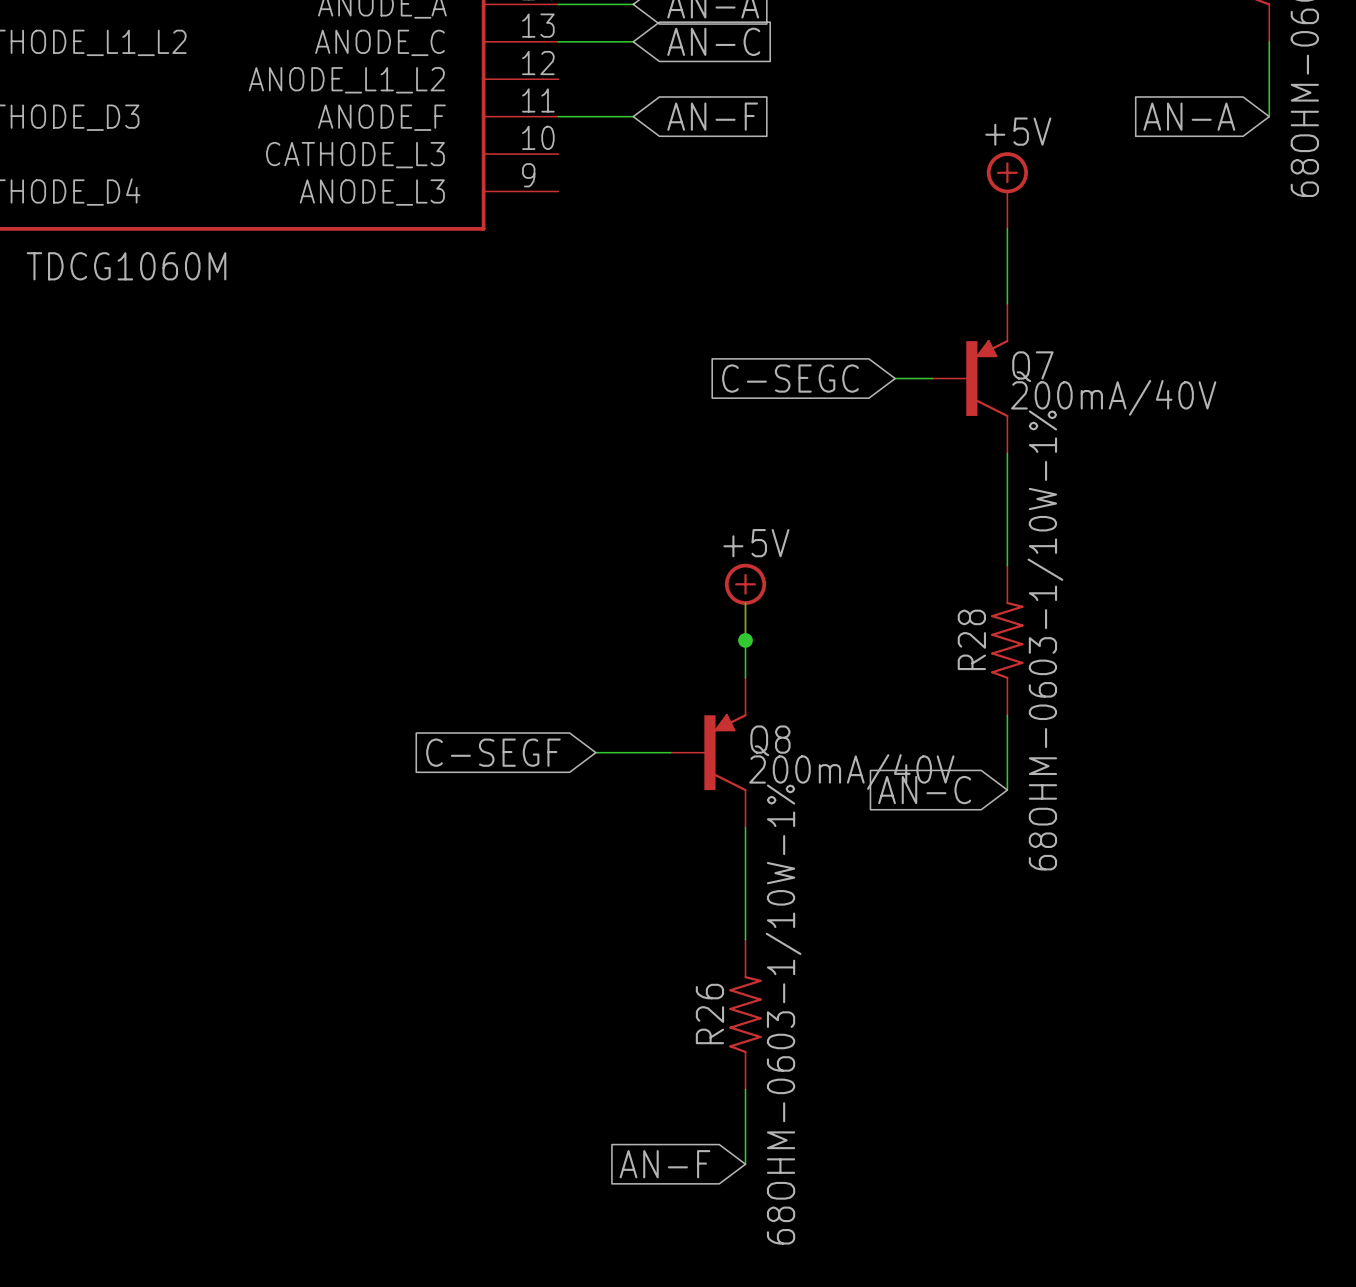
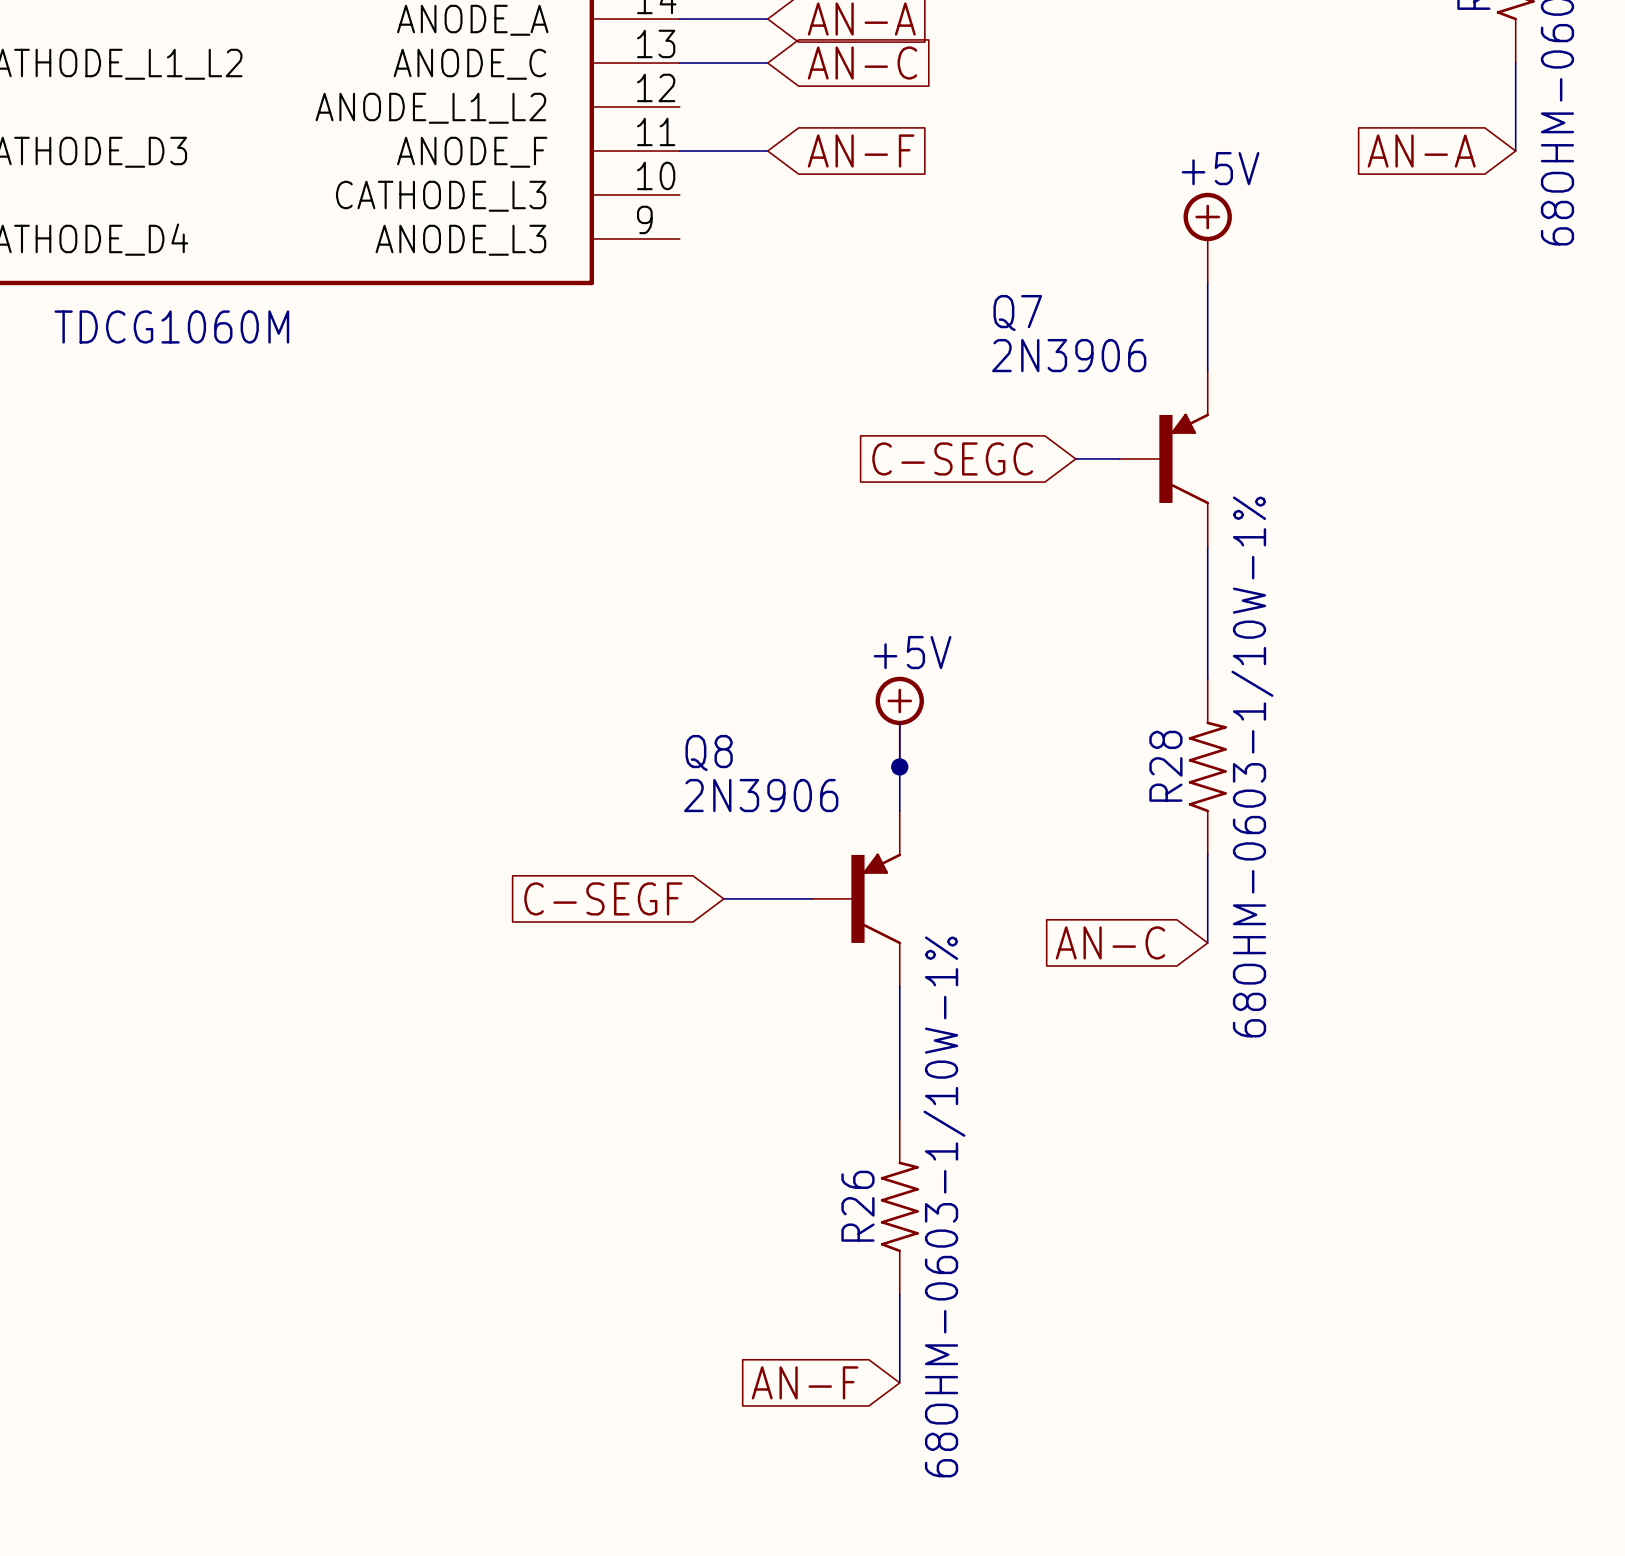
Q7 name position: Q7 (1032, 366) -> Q7 (1017, 313)
Q7 value: 200mA/40V (1113, 397) -> 2N3906 (1069, 355)
Q8 name position: Q8 (770, 740) -> Q8 (709, 753)
Q8 value: 200mA/40V (851, 772) -> 2N3906 (761, 795)

